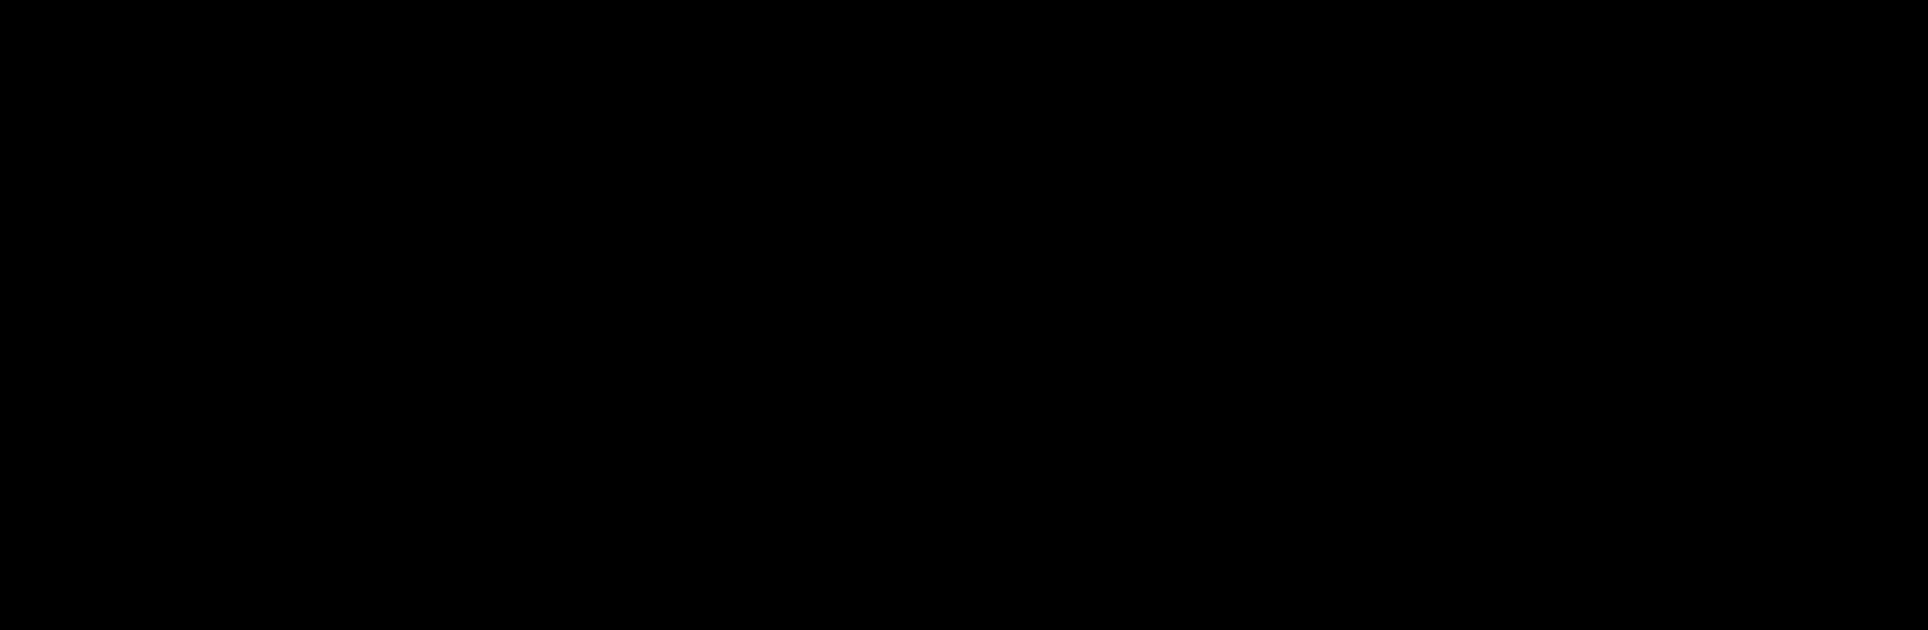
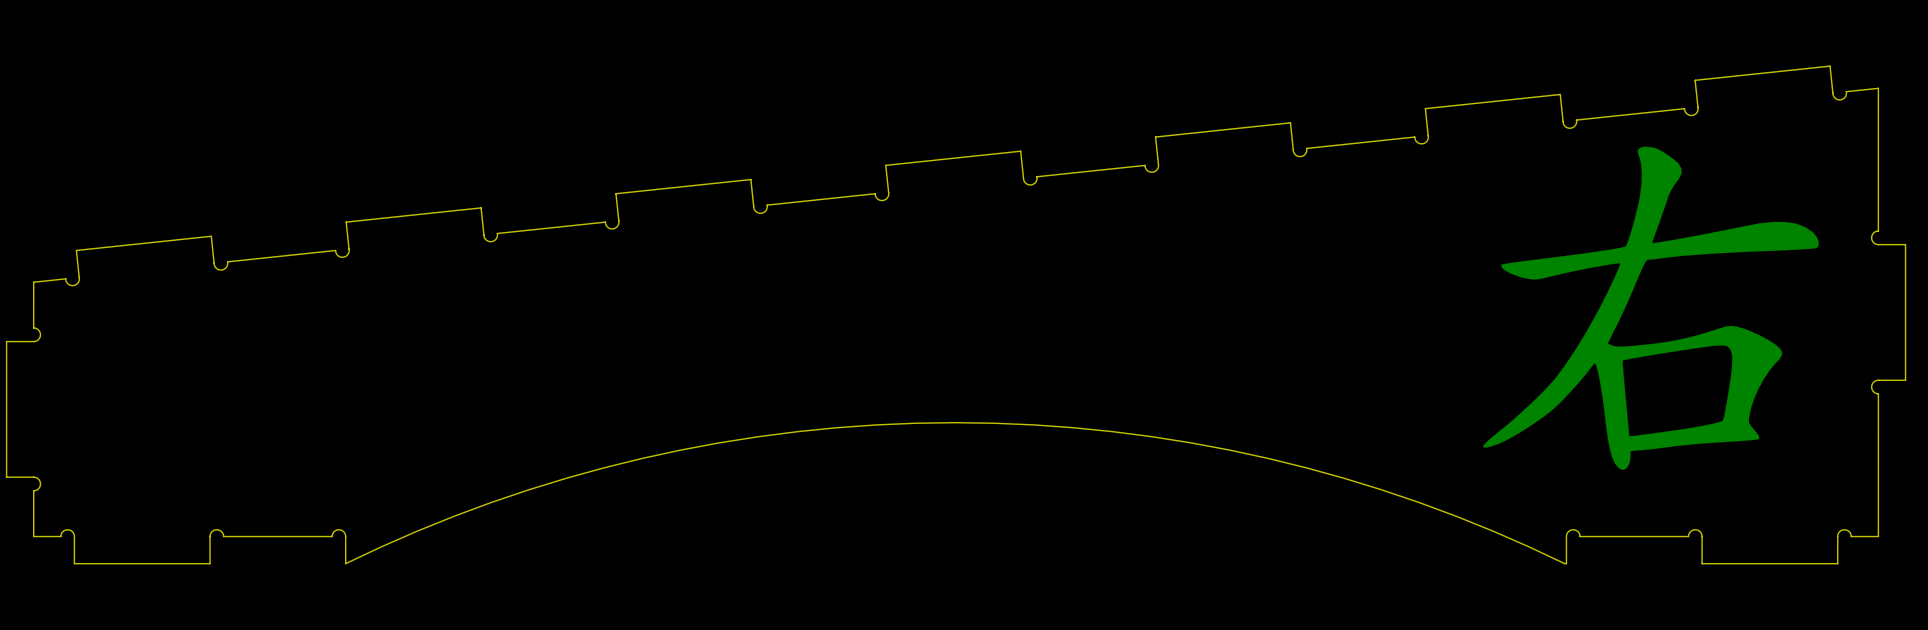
drawing: none -> [1482, 146, 1819, 471]
board edge: none -> (1878, 380) (1905, 380) (1905, 244) (1877, 244) (1871, 238) (1873, 233) (1878, 231) (1878, 88) (1846, 91) (1844, 98) (1836, 99) (1833, 94) (1830, 66) (1695, 80) (1698, 109) (1696, 113) (1692, 115) (1687, 114) (1684, 108) (1576, 120) (1575, 125) (1568, 128) (1563, 123) (1560, 94) (1425, 108) (1428, 137) (1426, 142) (1422, 143) (1417, 142) (1414, 137) (1306, 148) (1305, 154) (1299, 156) (1293, 151) (1290, 122) (1155, 137) (1158, 165) (1156, 169) (1152, 172) (1147, 170) (1144, 165) (1036, 176) (1035, 182) (1029, 184) (1023, 179) (1020, 151) (885, 165) (888, 194) (887, 198) (882, 200) (877, 199) (875, 193) (767, 205) (765, 210) (759, 213) (753, 208) (750, 179) (615, 193) (618, 222) (616, 227) (612, 228) (607, 227) (605, 222) (497, 233) (495, 239) (489, 241) (484, 236) (481, 207) (346, 222) (349, 250) (347, 254) (343, 257) (338, 255) (335, 250) (227, 261) (226, 267) (219, 269) (214, 264) (211, 236) (76, 250) (79, 279) (76, 284) (69, 284) (65, 278) (33, 282) (33, 328) (39, 331) (39, 337) (34, 341) (6, 341) (6, 477) (34, 477) (39, 481) (39, 487) (33, 490) (33, 536) (60, 536) (64, 530) (71, 530) (74, 535) (74, 563) (210, 563) (210, 535) (215, 529) (220, 531) (223, 536) (332, 536) (334, 531) (339, 529) (345, 535) (345, 563)
board edge: none -> (1878, 380) (1873, 382) (1871, 387) (1873, 391) (1878, 393) (1878, 536) (1851, 536) (1847, 530) (1841, 530) (1837, 535) (1837, 563) (1702, 563) (1701, 534) (1695, 529) (1690, 531) (1688, 536) (1580, 536) (1577, 531) (1571, 529) (1566, 534) (1566, 563) (1564, 563) (1492, 530) (1419, 502) (1344, 478) (1267, 458) (1190, 442) (1112, 431) (1033, 424) (955, 422) (876, 424) (797, 431) (719, 442) (642, 458) (566, 478) (490, 502) (417, 531) (345, 563)

